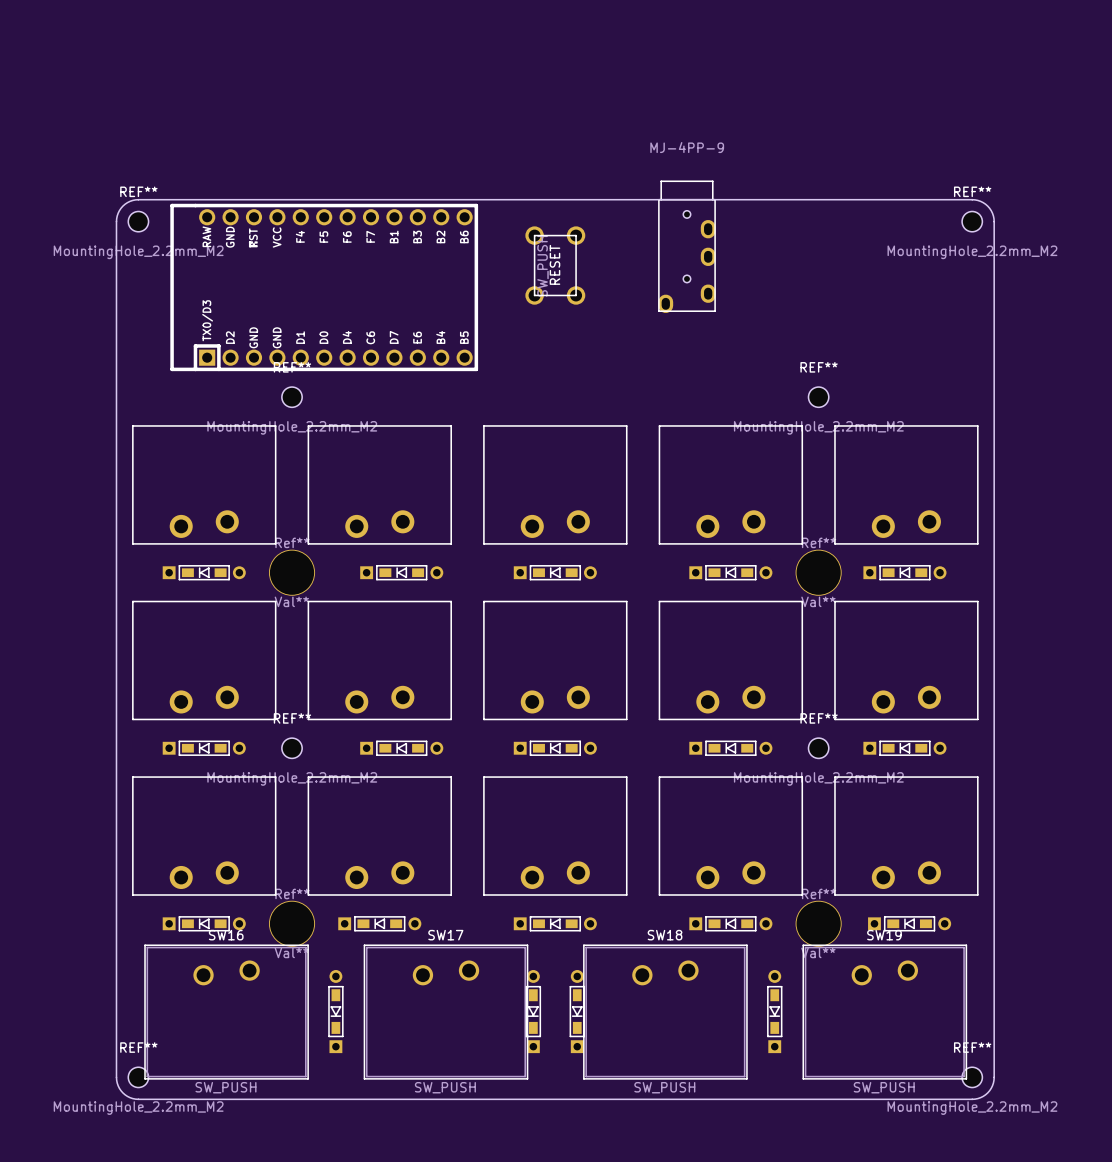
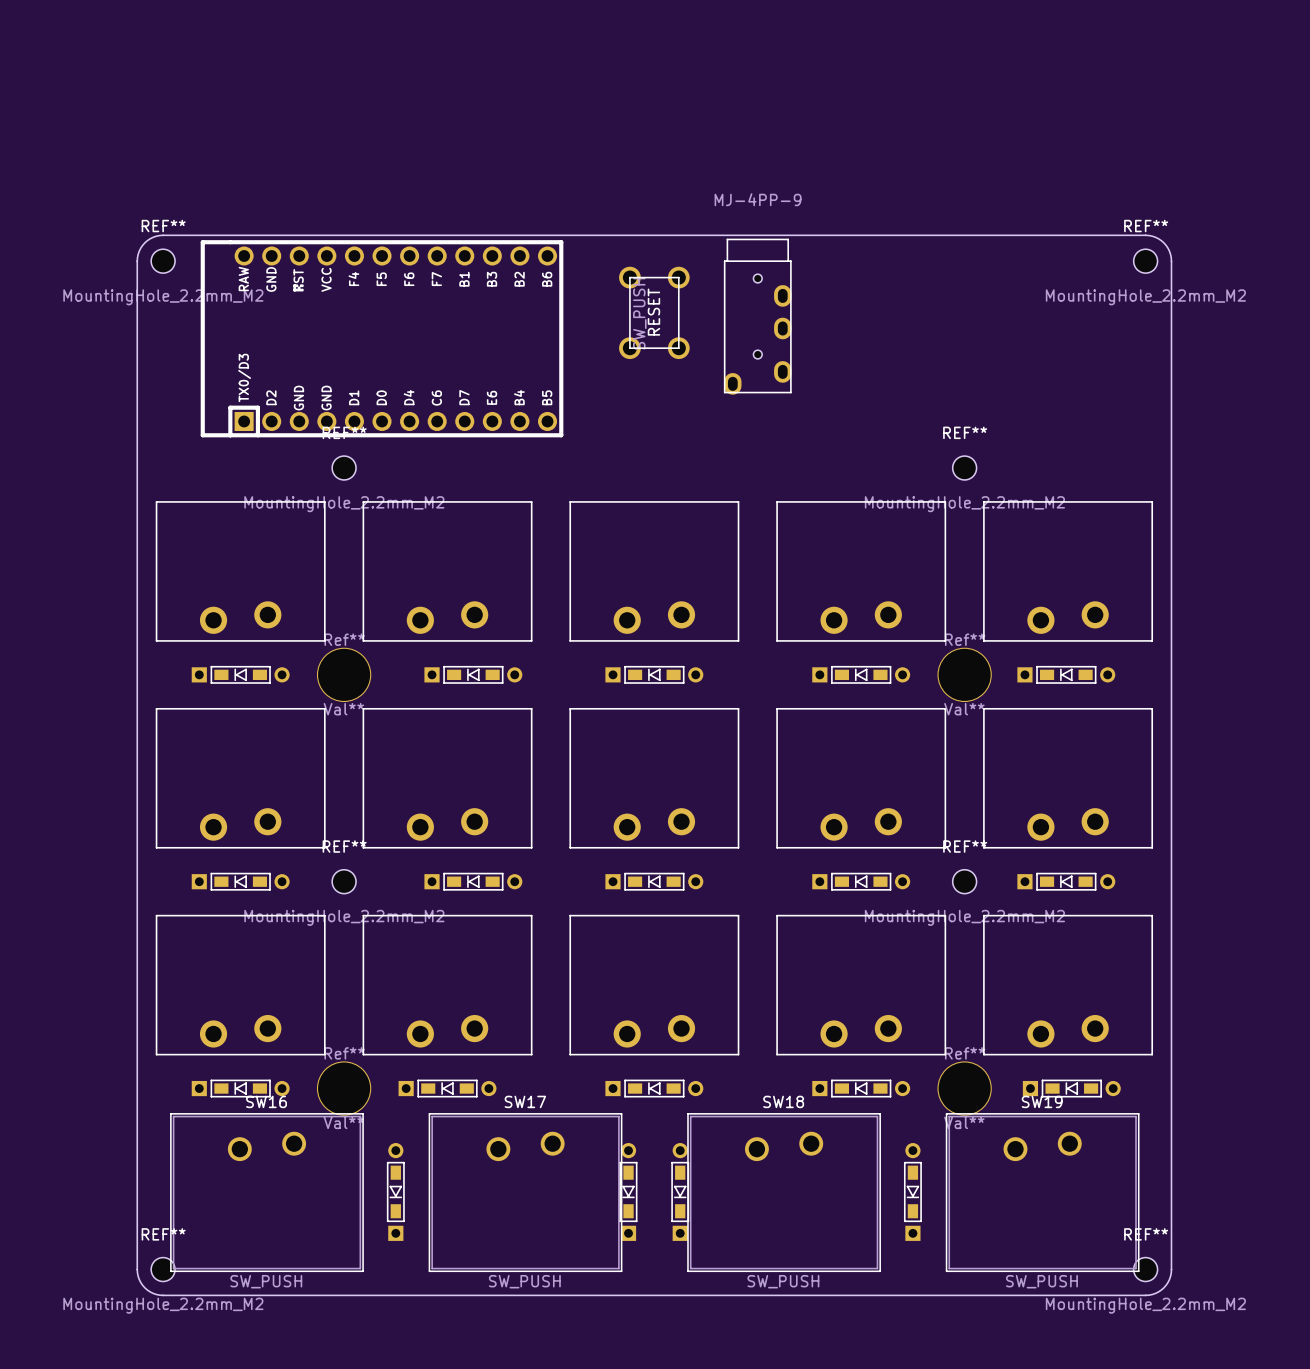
part position: (686, 246) -> (757, 316)

